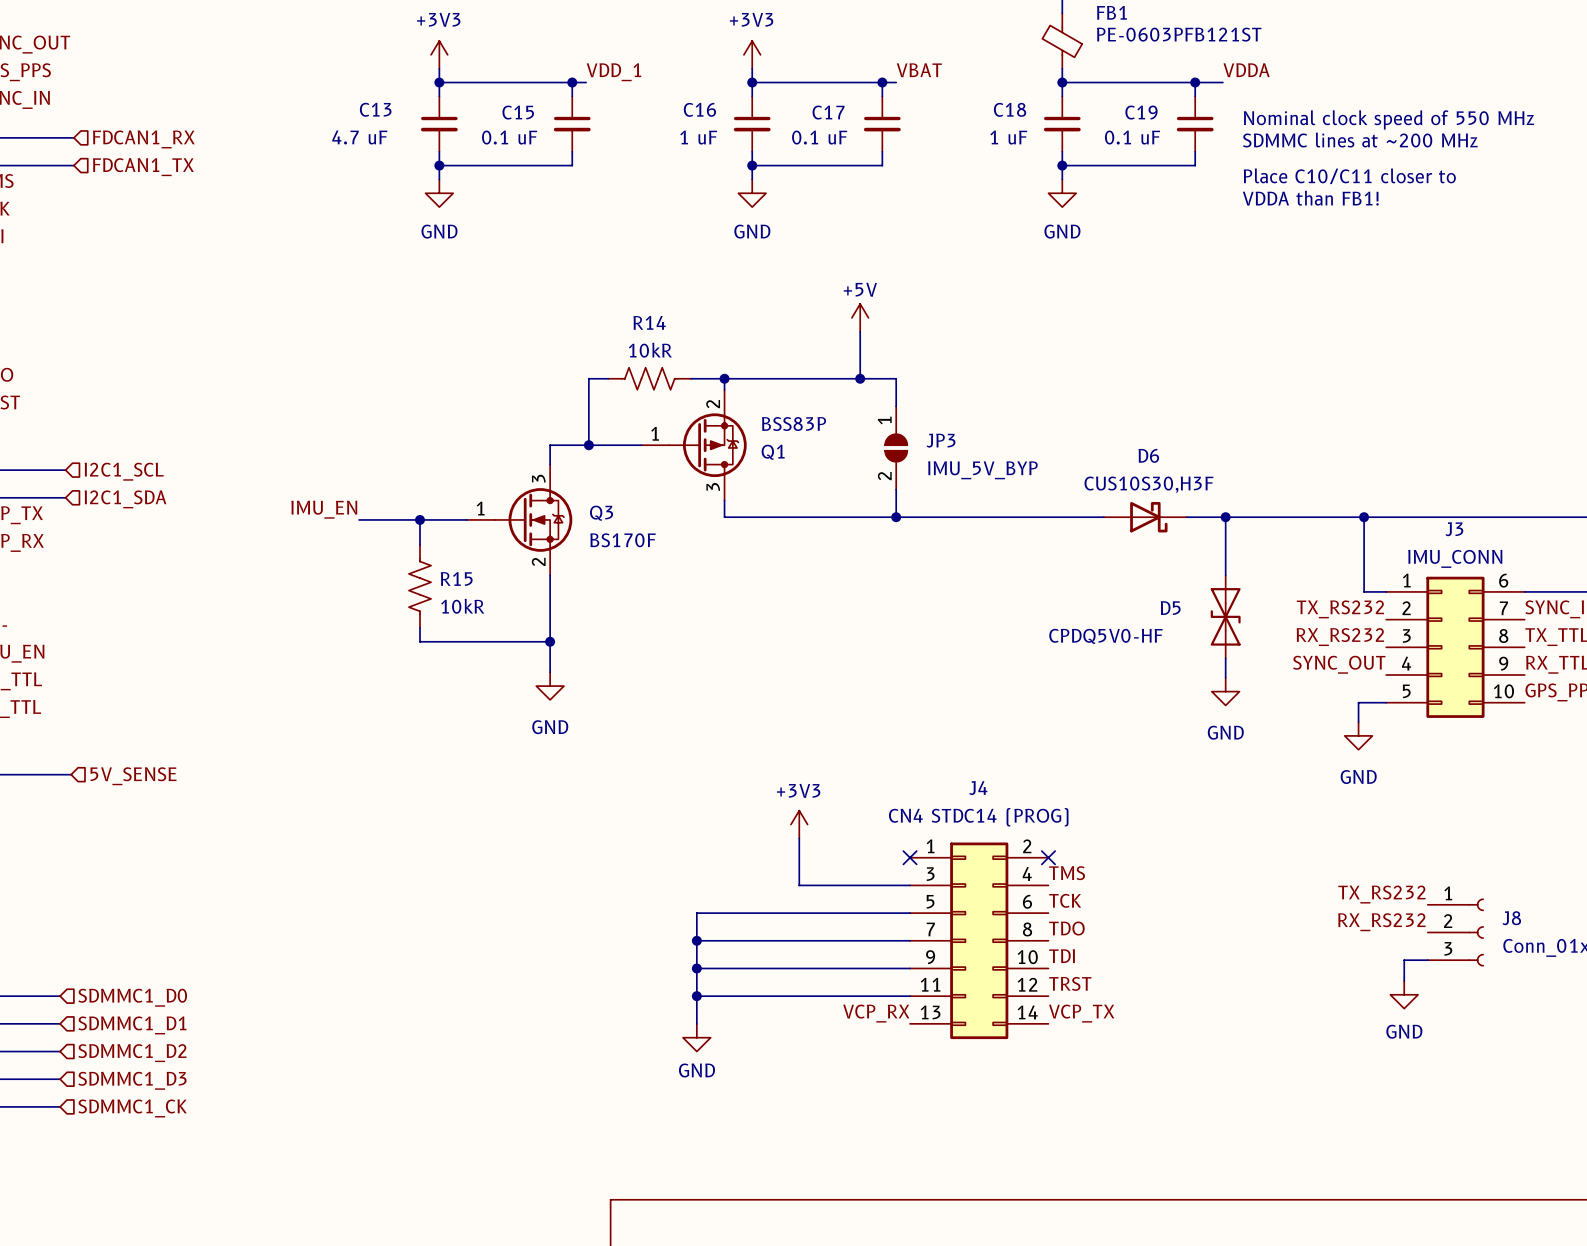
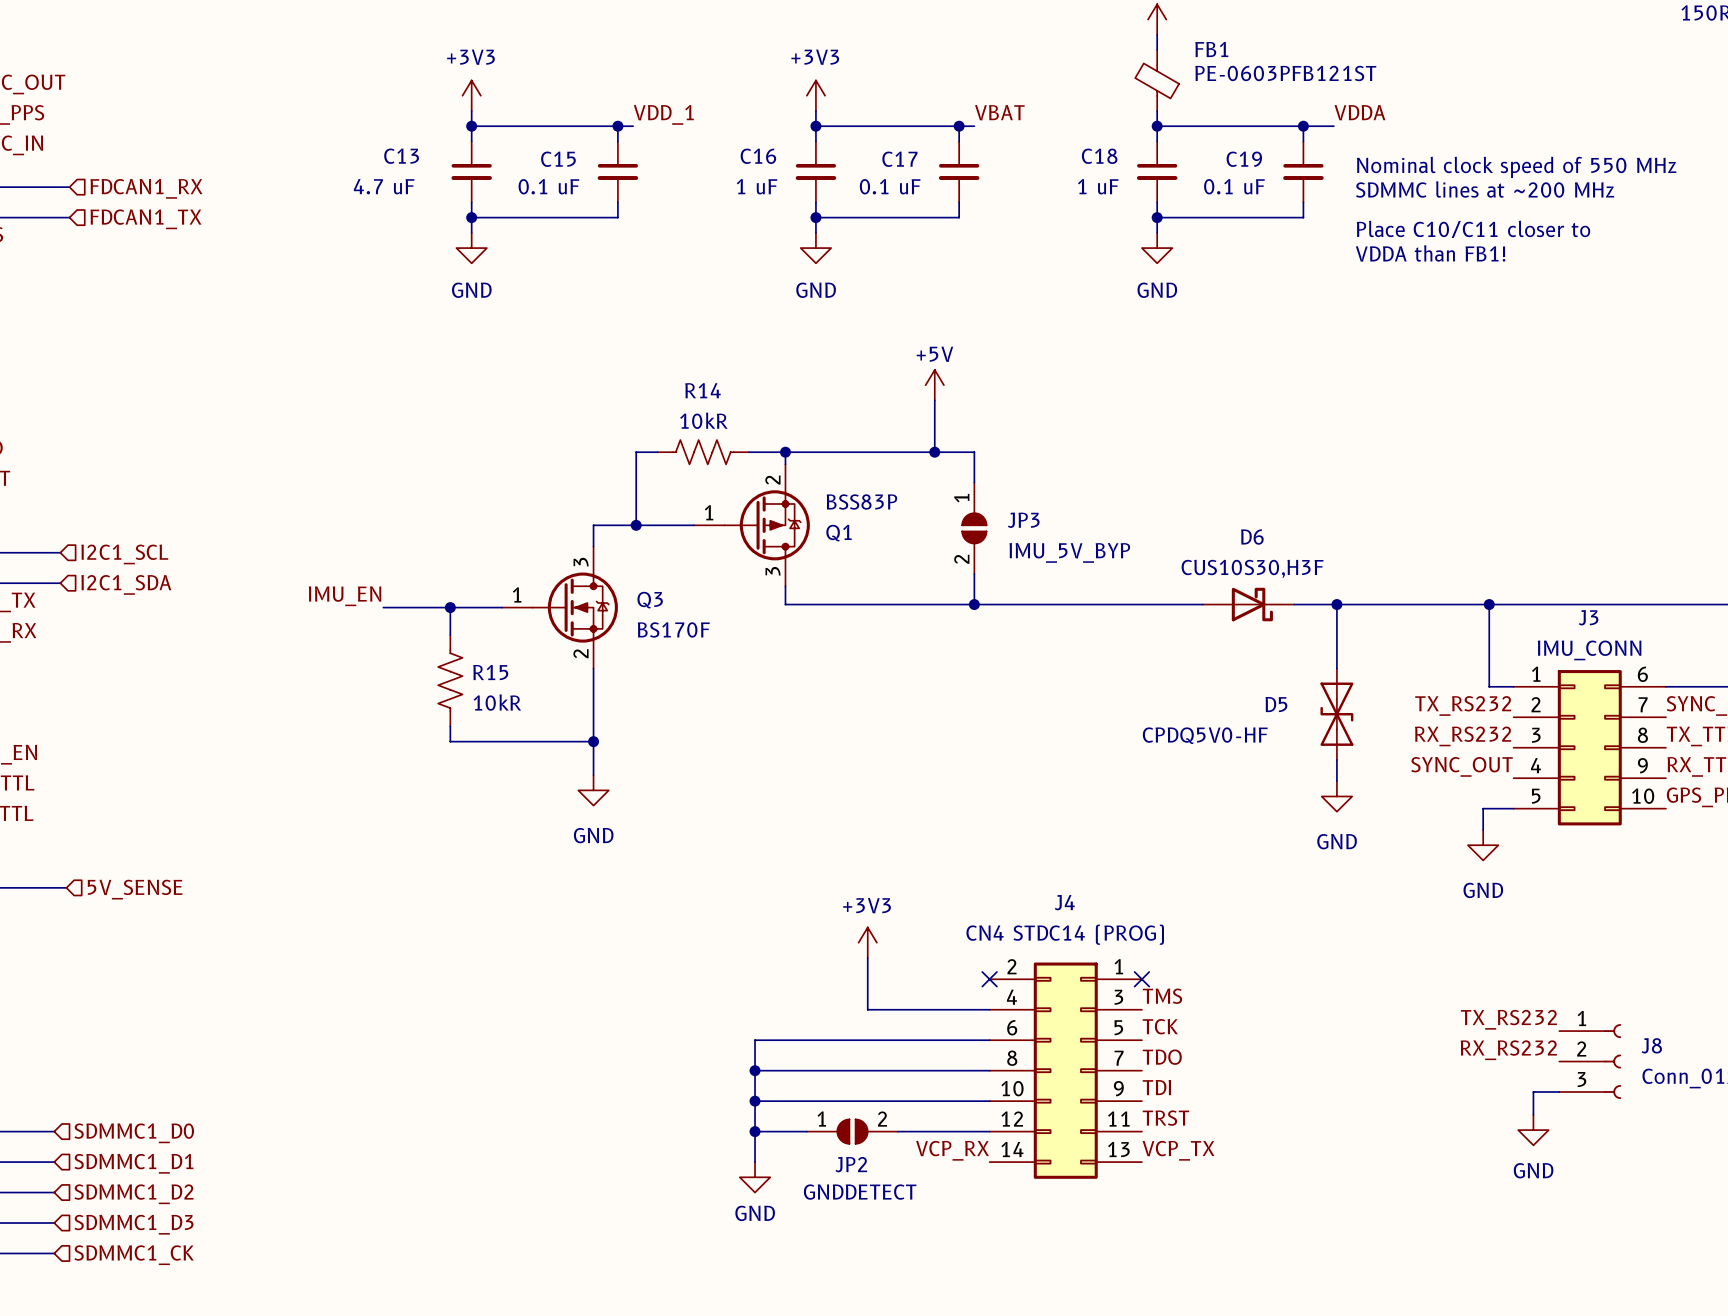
J4 flip: as is (979, 940) -> left-right (1065, 1070)
JP2: none -> GNDDETECT (852, 1131)

